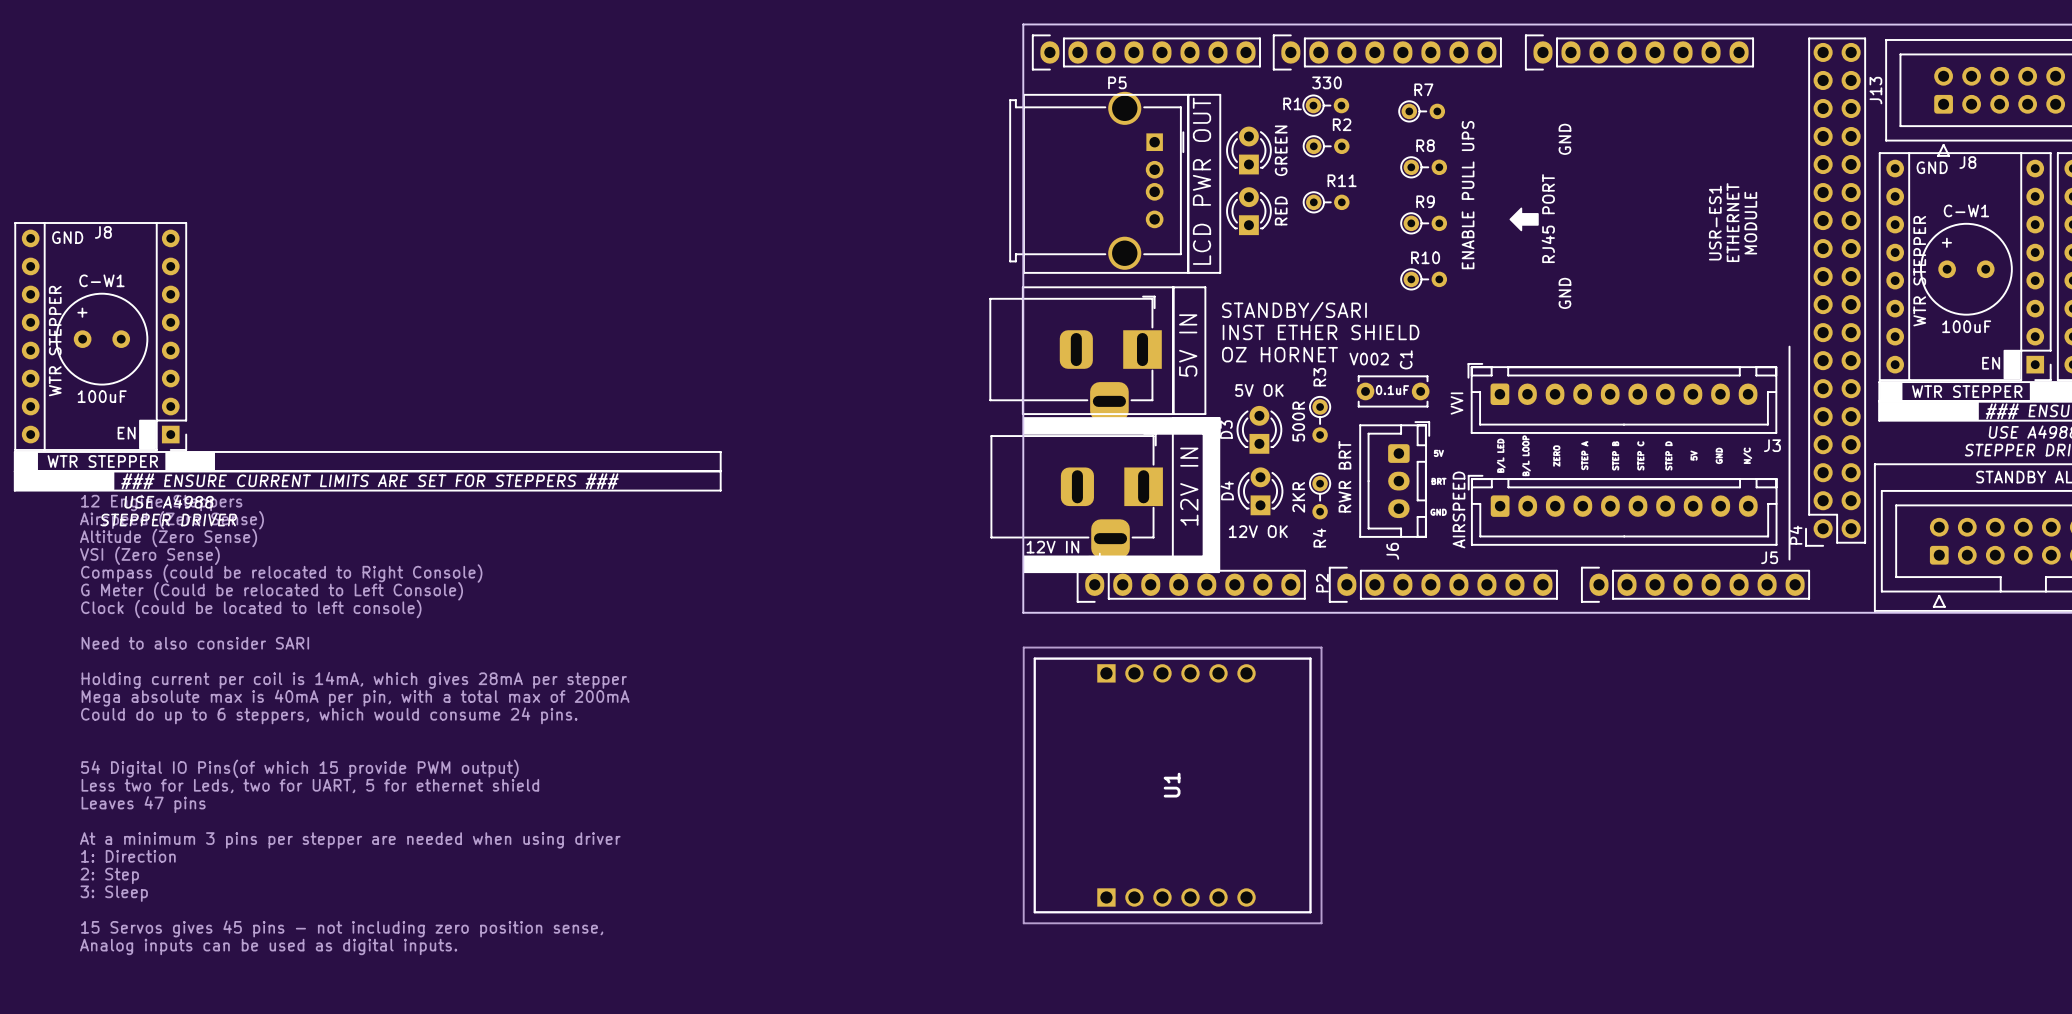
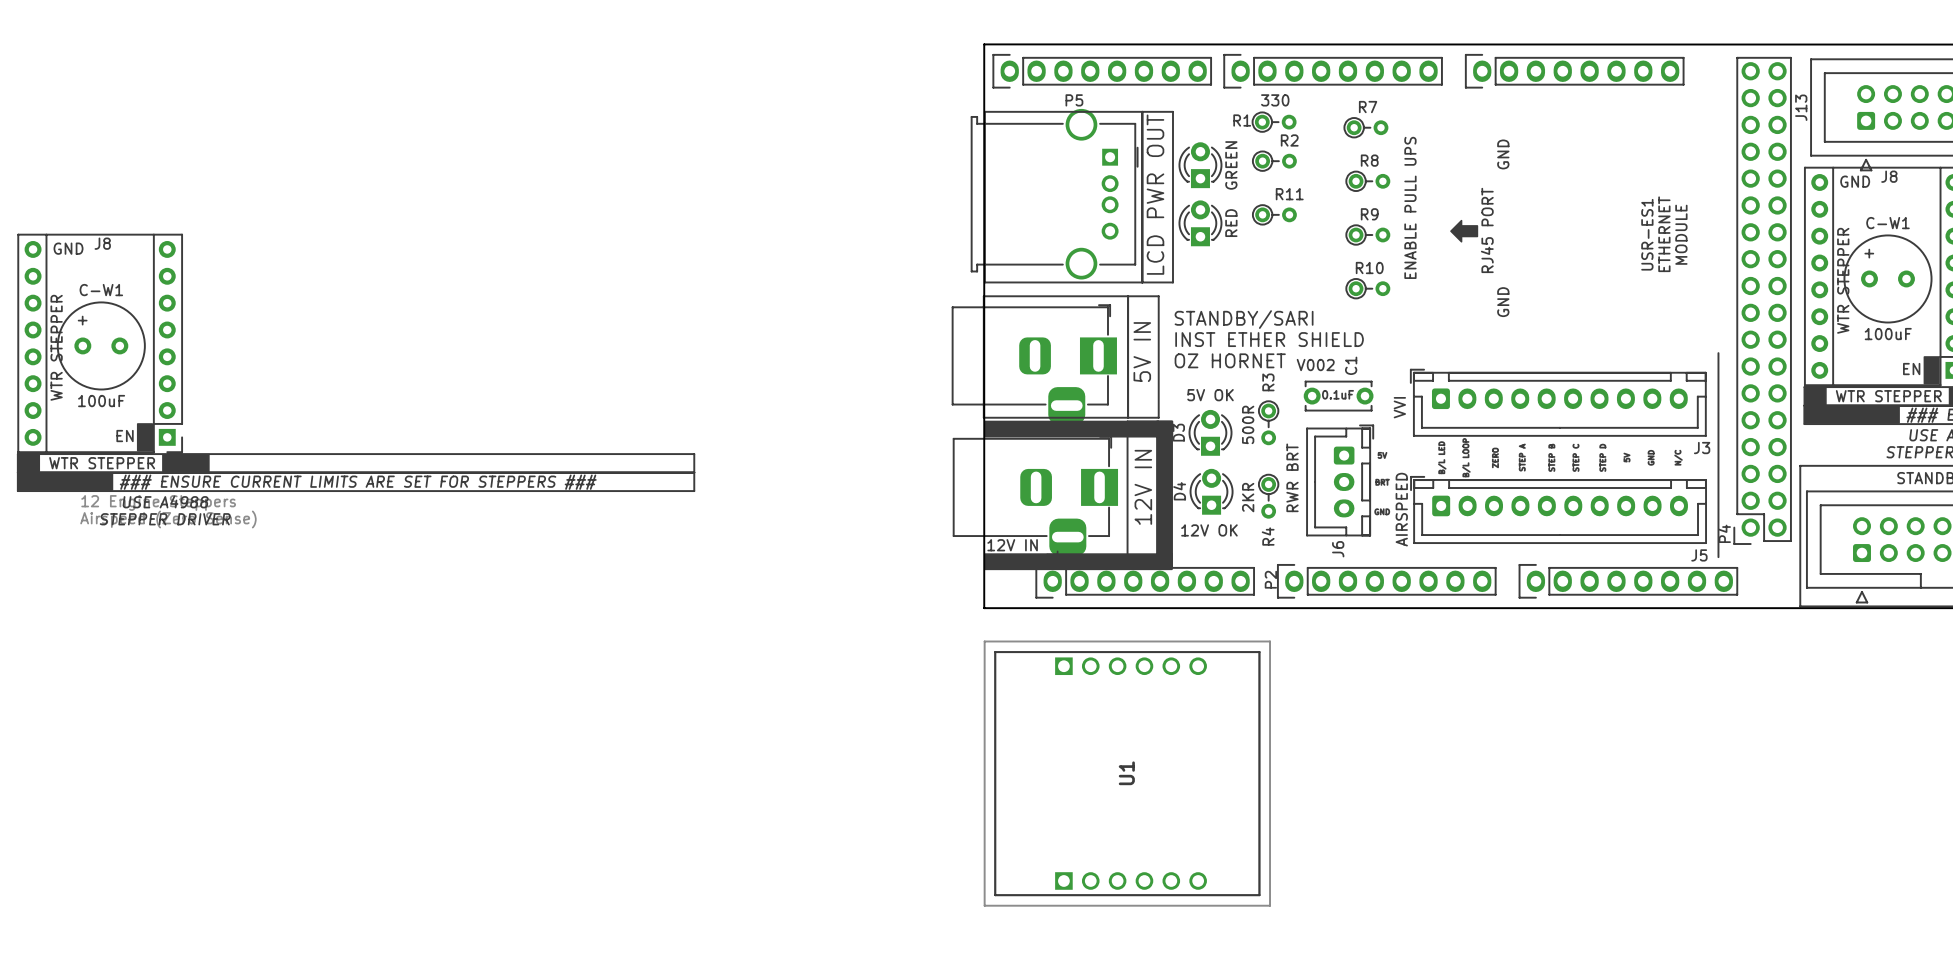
text: Altitude (Zero Sense) (168, 538) -> none
text: VSI (Zero Sense) (149, 555) -> none
text: Compass (could be relocated to Right Console) (281, 573) -> none
text: G Meter (Could be relocated to Left Console) (272, 591) -> none
text: Clock (could be located to left console) (251, 609) -> none
text: Need to also consider SARI (195, 643) -> none
text: Holding current per coil is 14mA, which gives 28mA per stepper (354, 680) -> none
text: Mega absolute max is 40mA per pin, with a total max of 200mA (355, 698) -> none
text: Could do up to 6 steppers, which would consume 24 pins. (329, 715) -> none
text: 54 Digital IO Pins(of which 15 provide PWM output) (299, 768) -> none
text: Less two for Leds, two for UART, 5 for ethernet shield (310, 786) -> none
text: Leaves 47 pins (143, 804) -> none
text: At a minimum 3 pins per stepper are needed when using driver (350, 840) -> none
text: 1: Direction (128, 856) -> none
text: 2: Step (109, 875) -> none
text: 3: Sleep (114, 893) -> none
text: 15 Servos gives 45 pins - not including zero position sense, (342, 928) -> none
text: Analog inputs can be used as digital inputs. (268, 946) -> none

